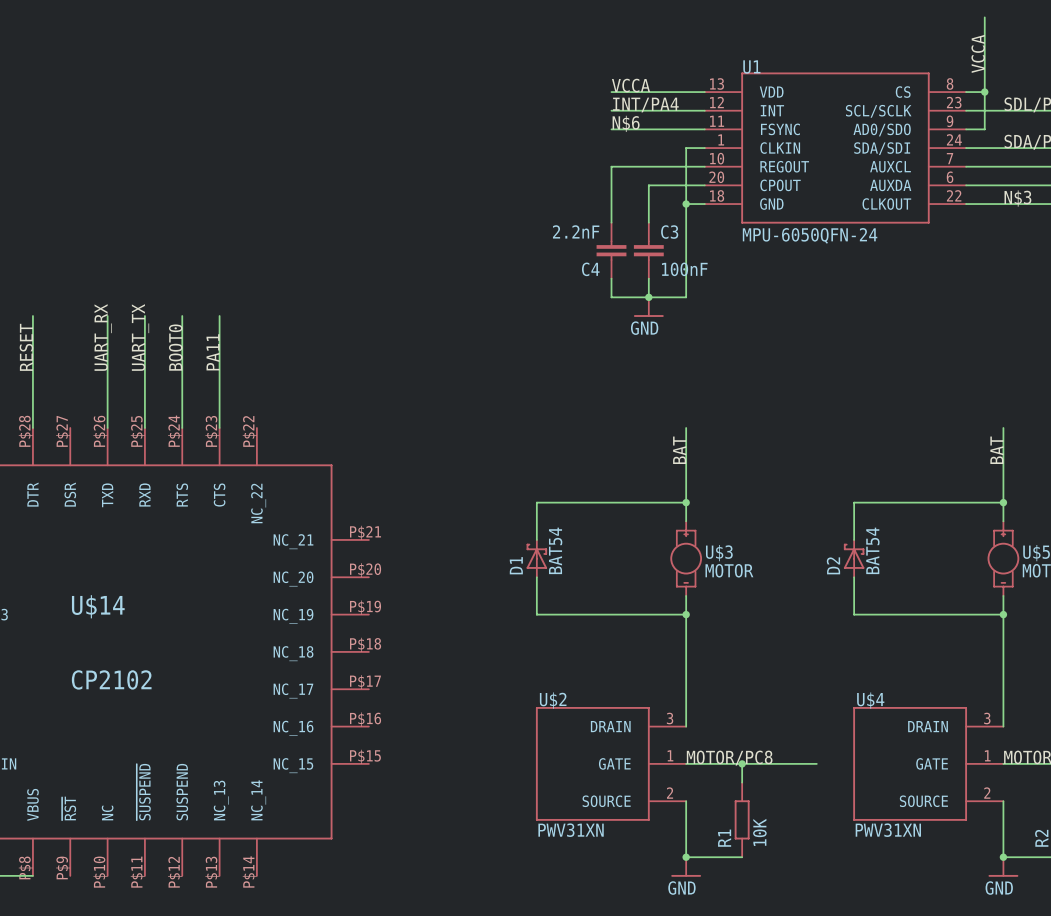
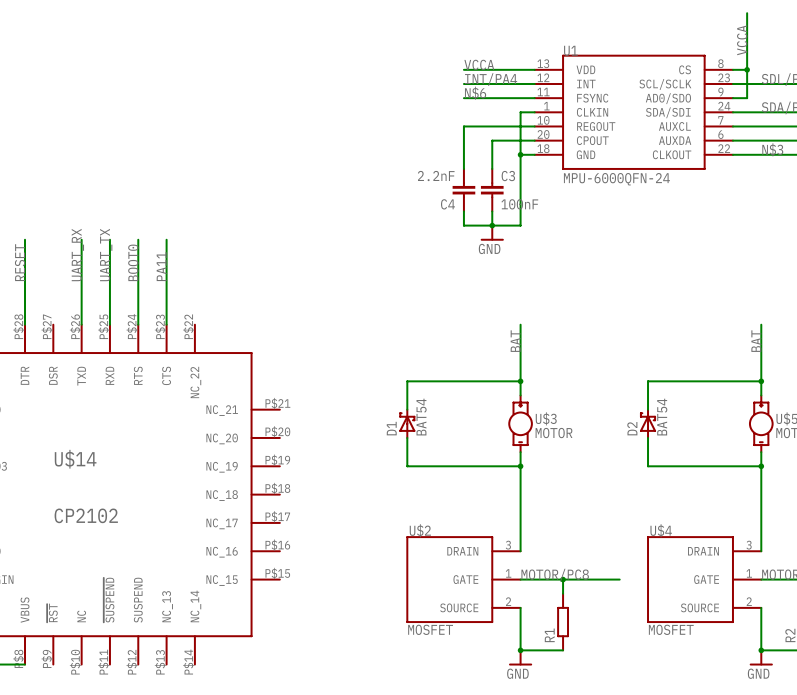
U1 value: MPU-6050QFN-24 (810, 235) -> MPU-6000QFN-24 (616, 179)
U$2 value: PWV31XN (571, 830) -> MOSFET (430, 629)
U$4 value: PWV31XN (888, 830) -> MOSFET (671, 629)
R1 value: 10K (759, 832) -> none

